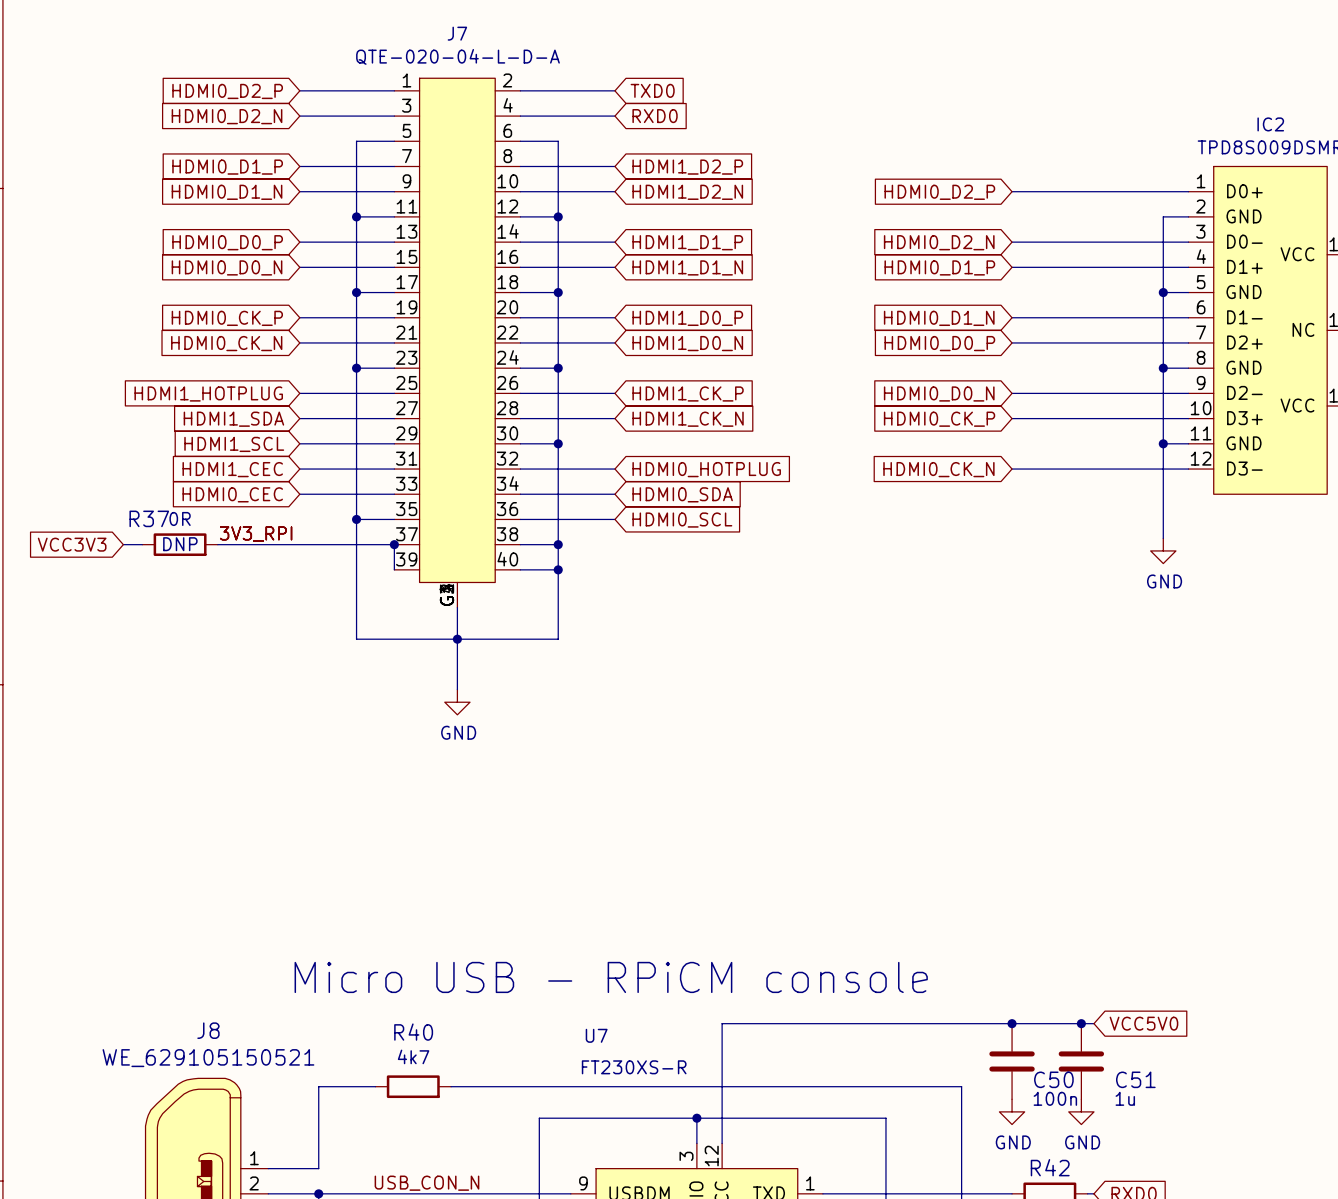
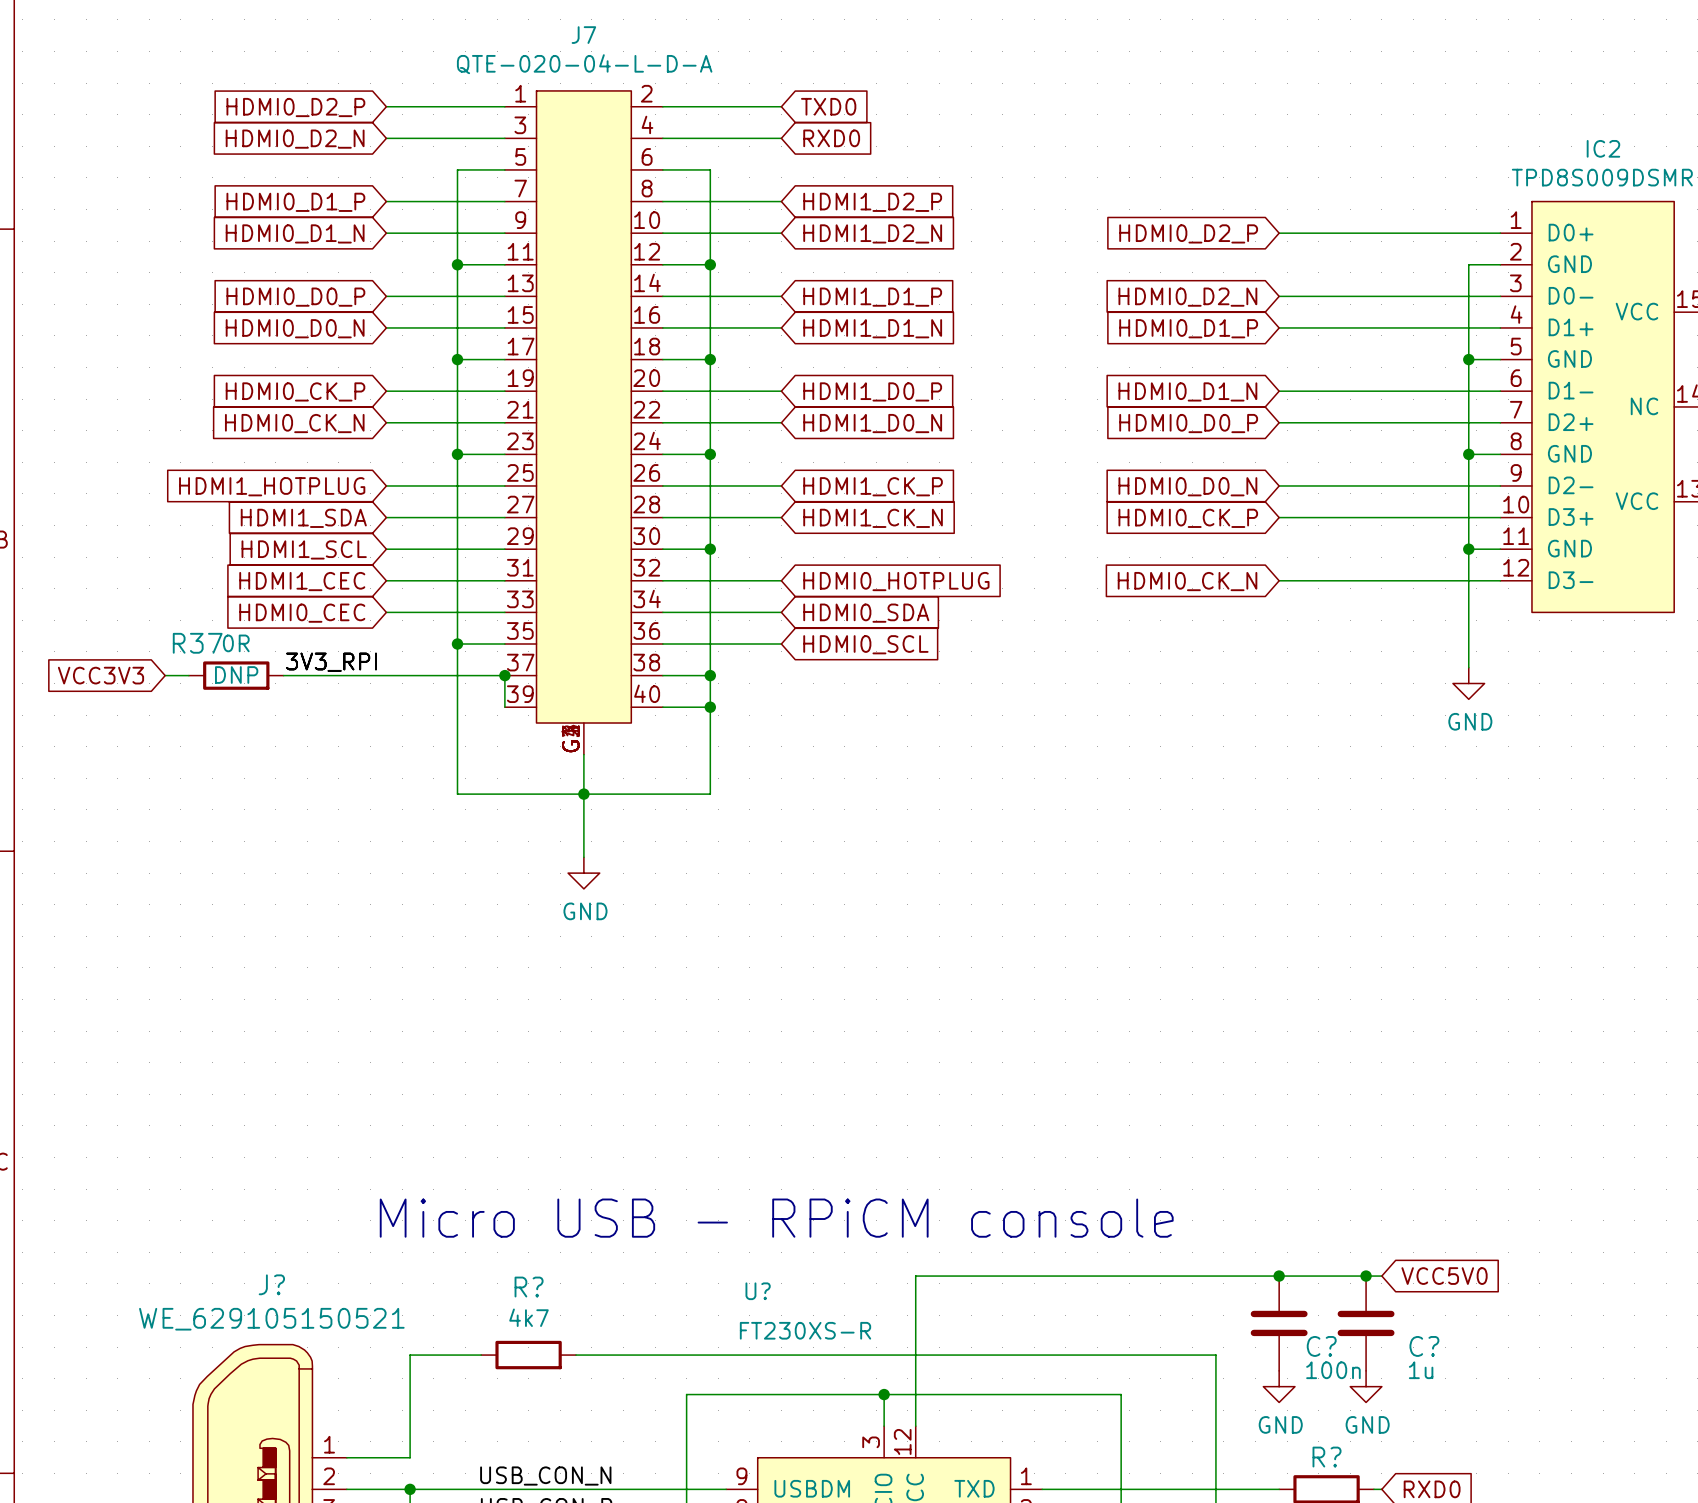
J8 name: J8 (208, 1030) -> J? (271, 1284)
R40 name: R40 (413, 1032) -> R? (529, 1287)
U7 name: U7 (596, 1035) -> U? (758, 1291)
C50 name: C50 (1053, 1079) -> C? (1321, 1346)
C51 name: C51 (1135, 1079) -> C? (1424, 1346)
R42 name: R42 (1050, 1167) -> R? (1327, 1457)

